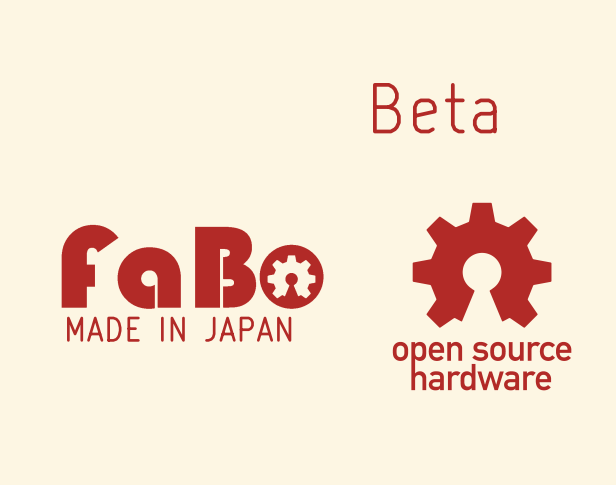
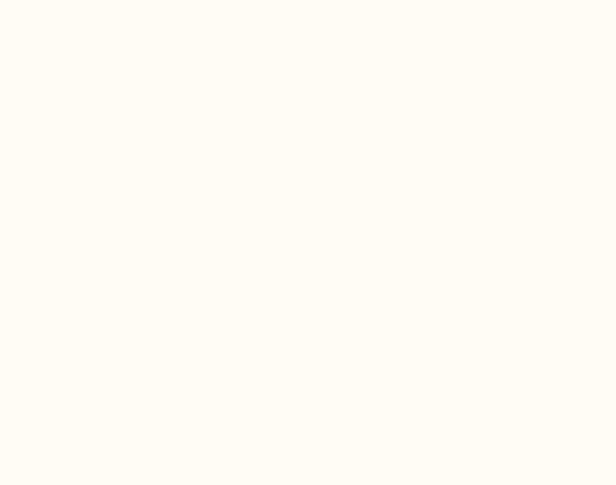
text: Beta (434, 108) -> none
part: (192, 266) -> none
part: (482, 296) -> none

